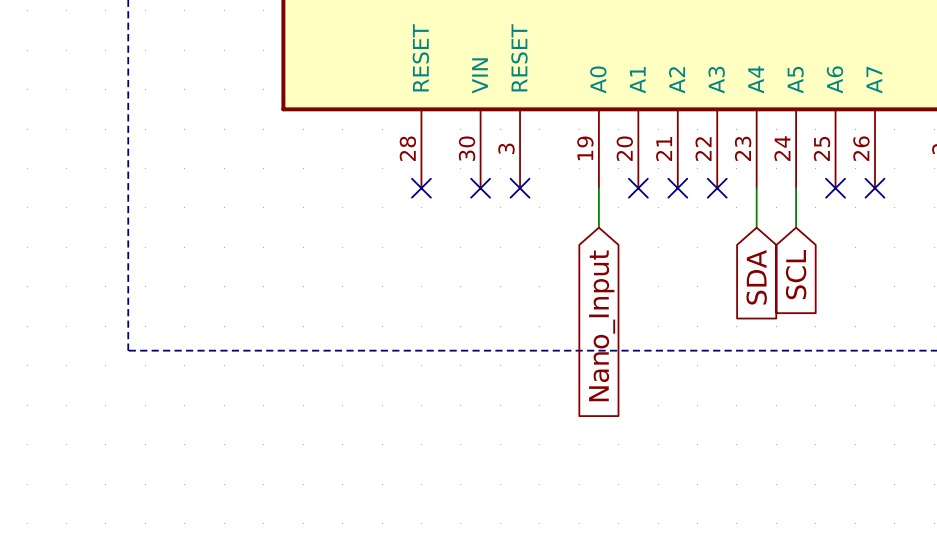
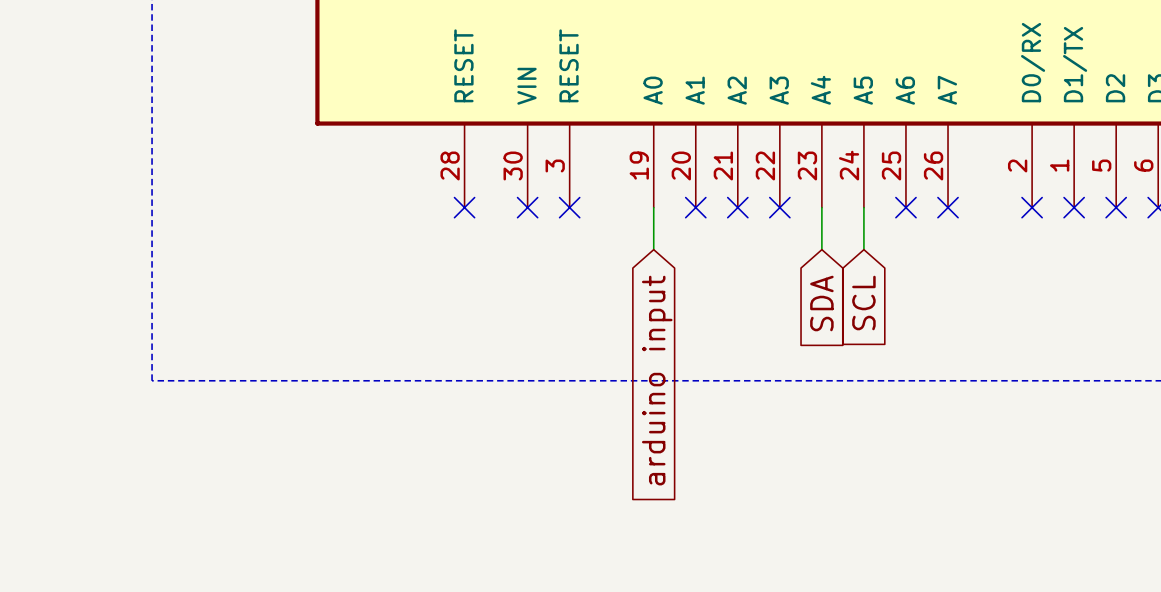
global label: Nano_Input (602, 325) -> arduino input (657, 380)

